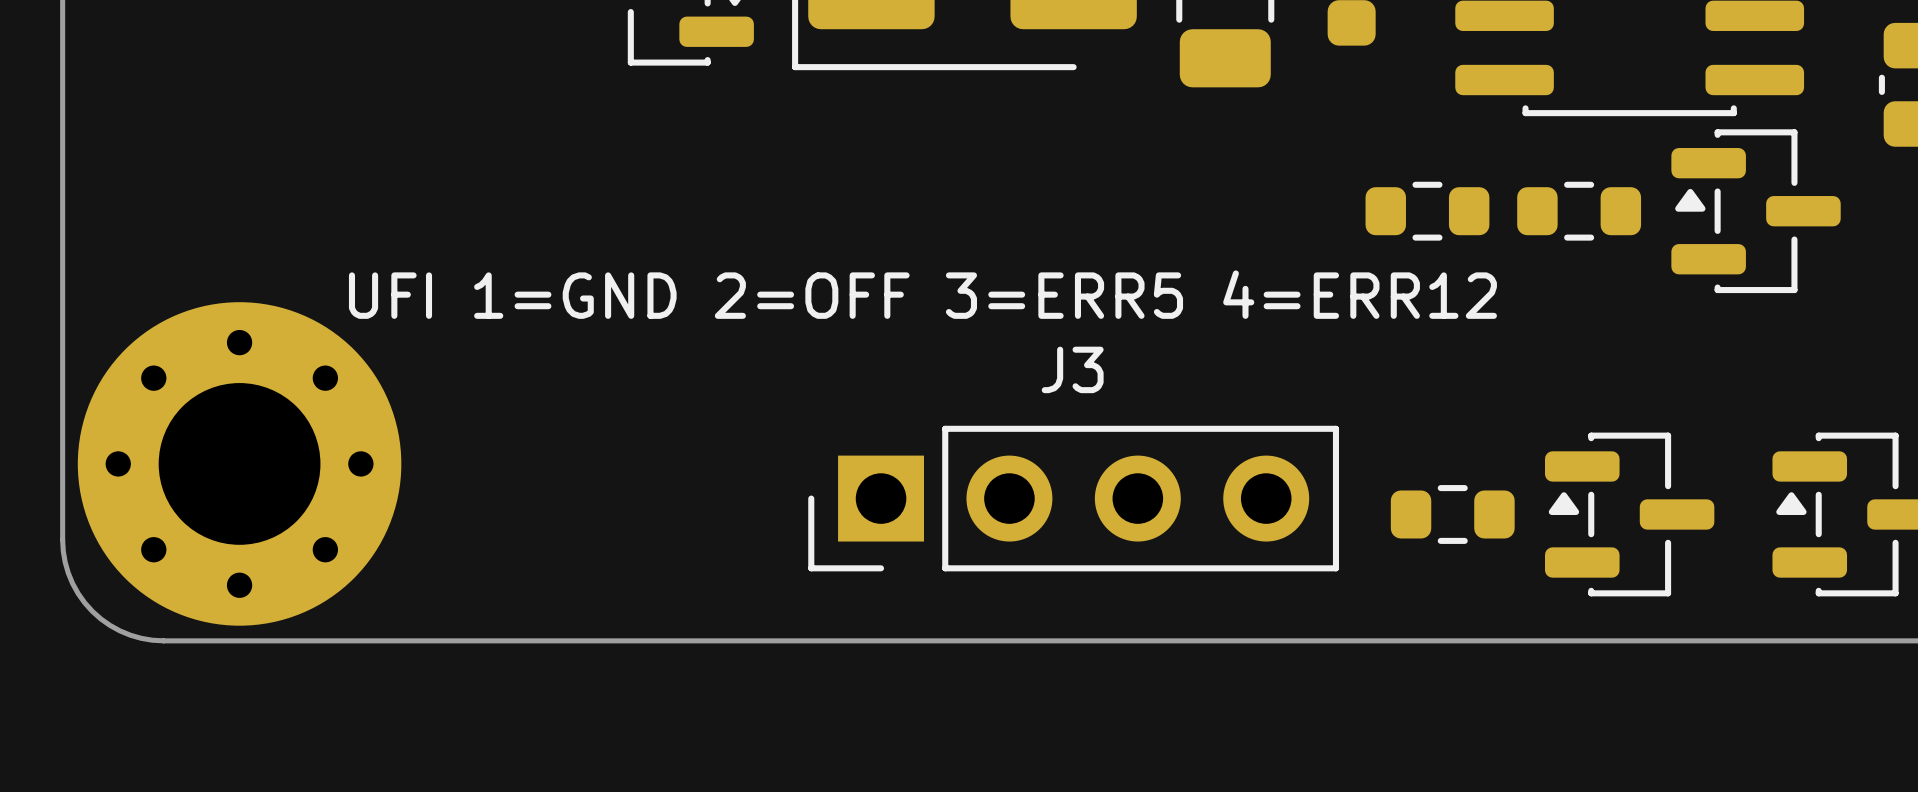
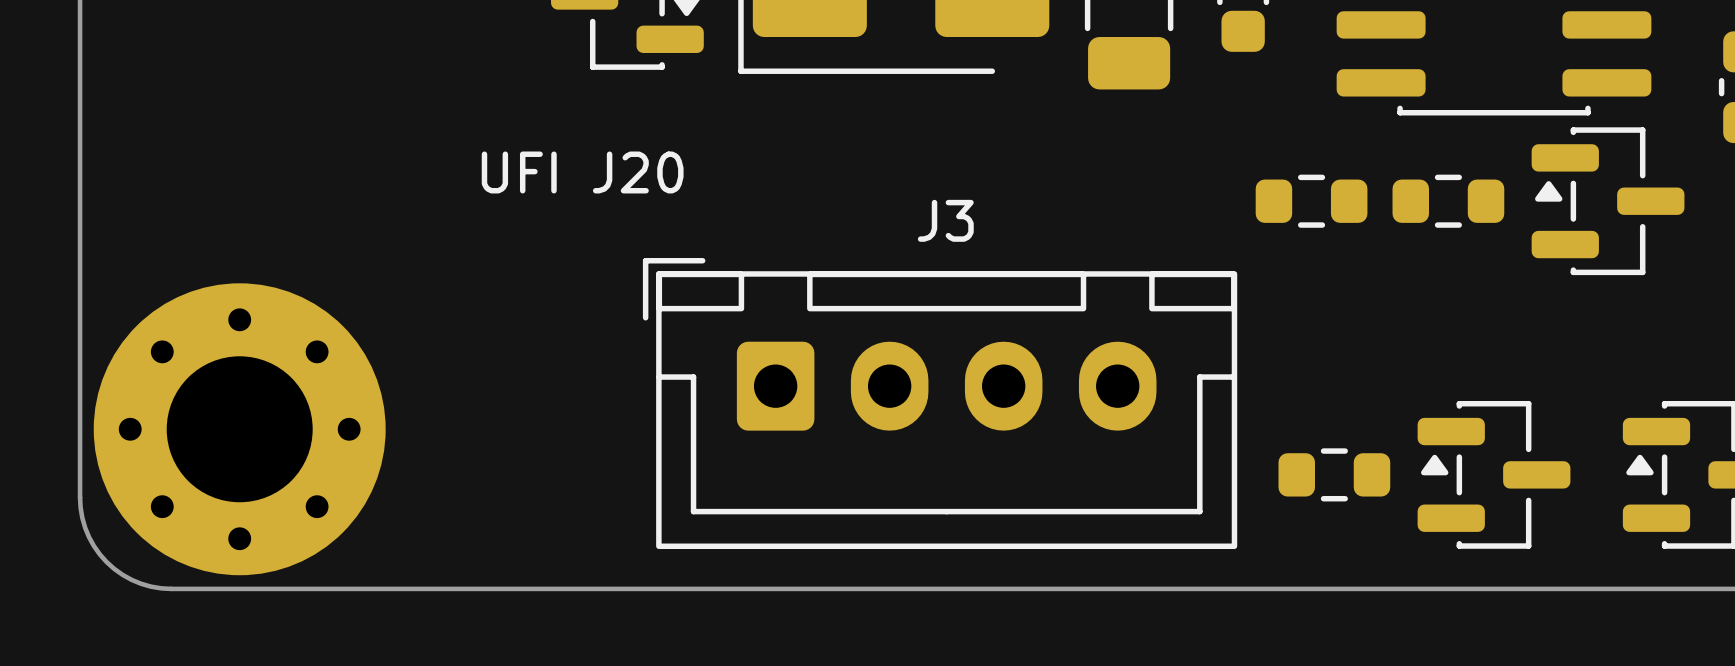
text: none -> UFI J20 (582, 172)
text: UFI 1=GND 2=OFF 3=ERR5 4=ERR12 (922, 294) -> none
J3 footprint: [808, 425, 1340, 572] -> [642, 258, 1238, 550]

